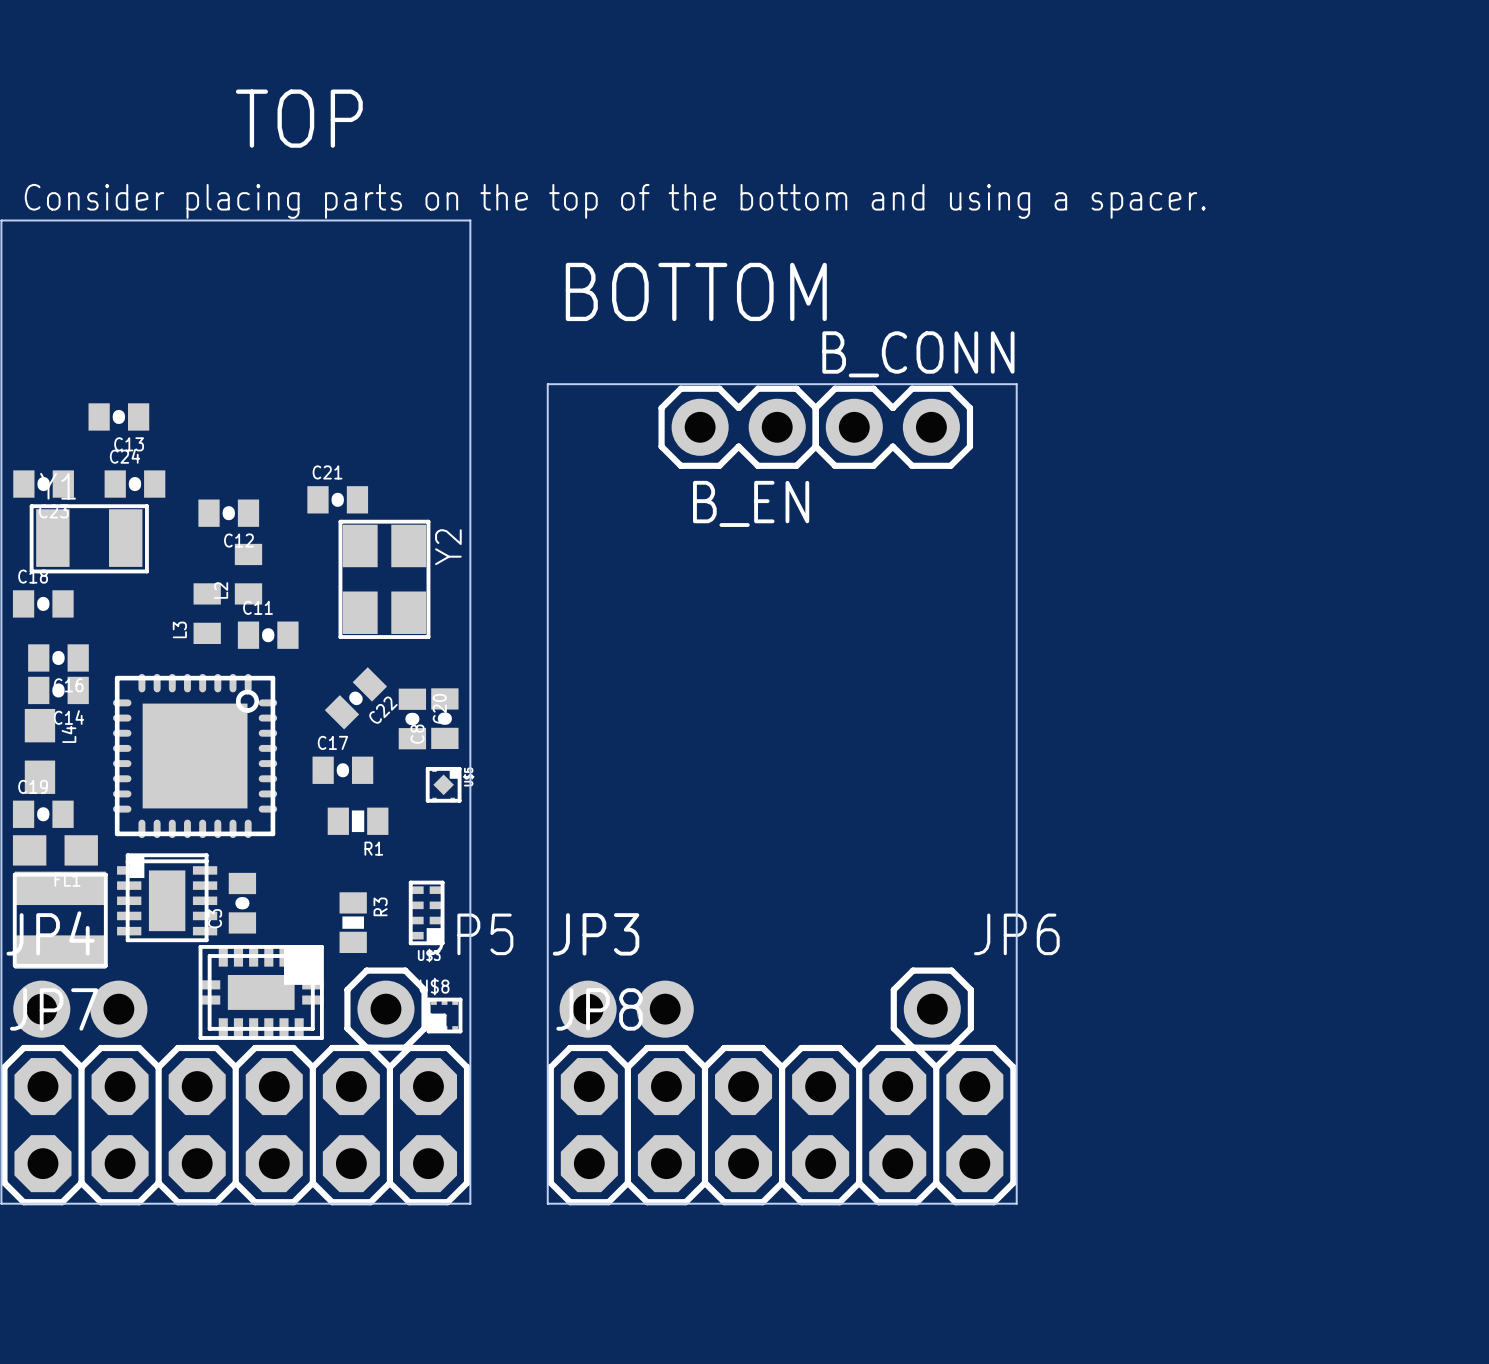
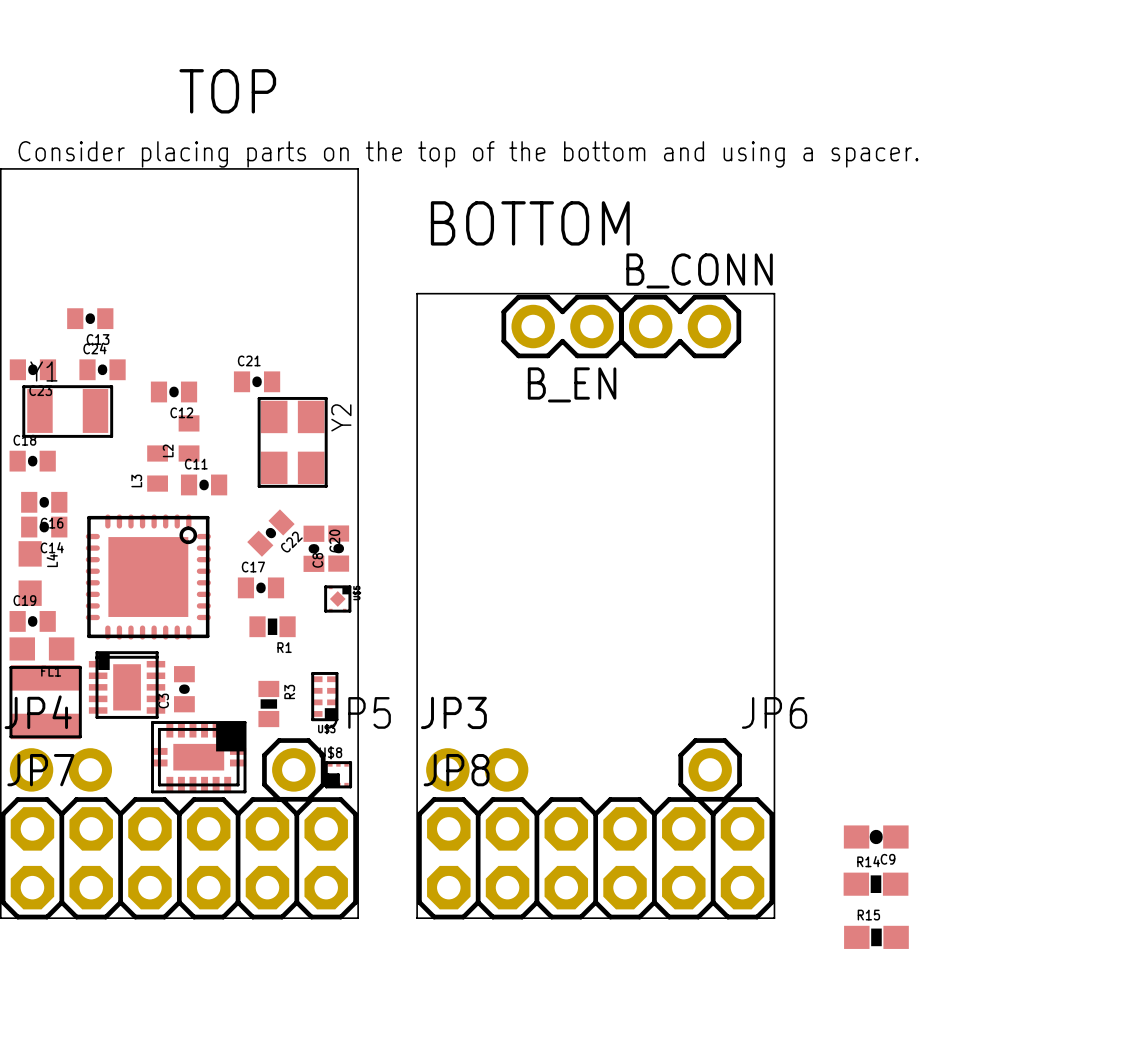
C9: none -> (876, 836)
R14: none -> (875, 884)
R15: none -> (876, 937)

